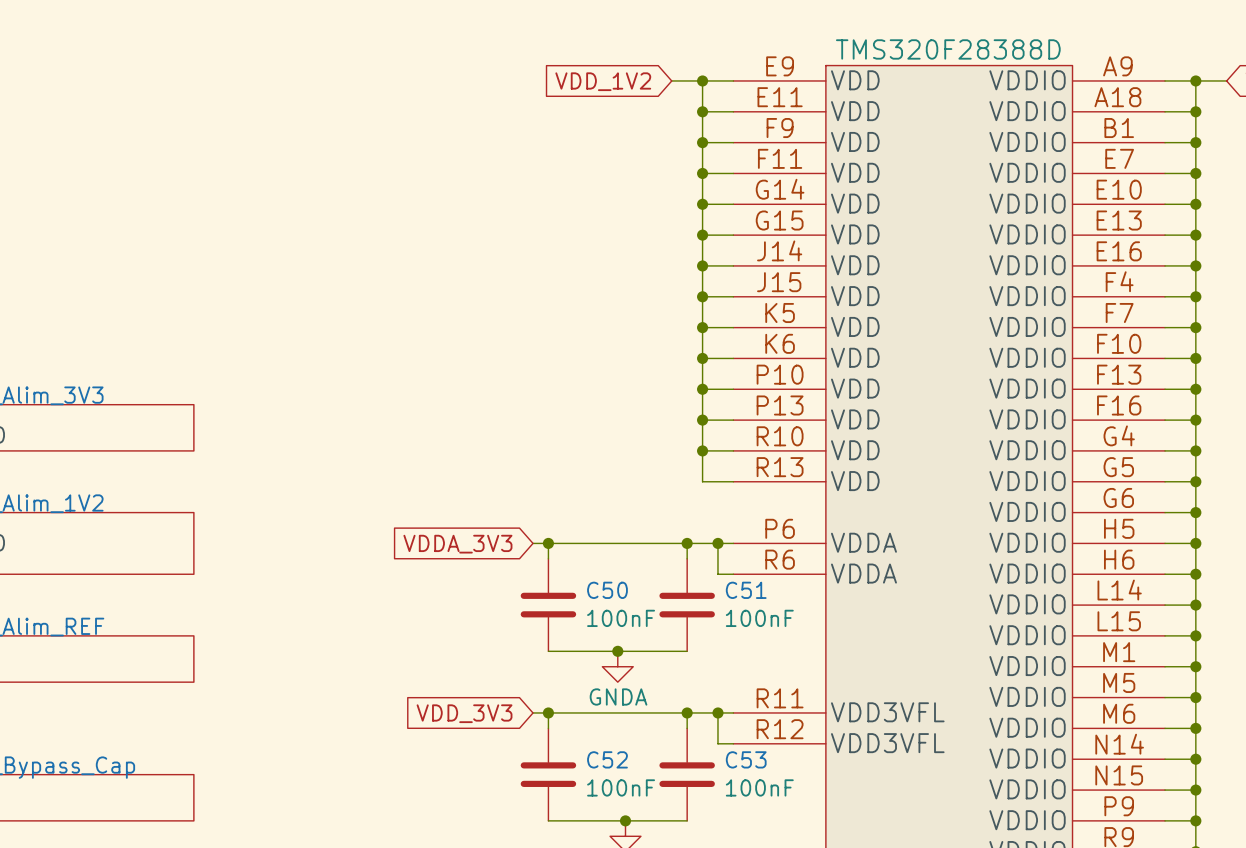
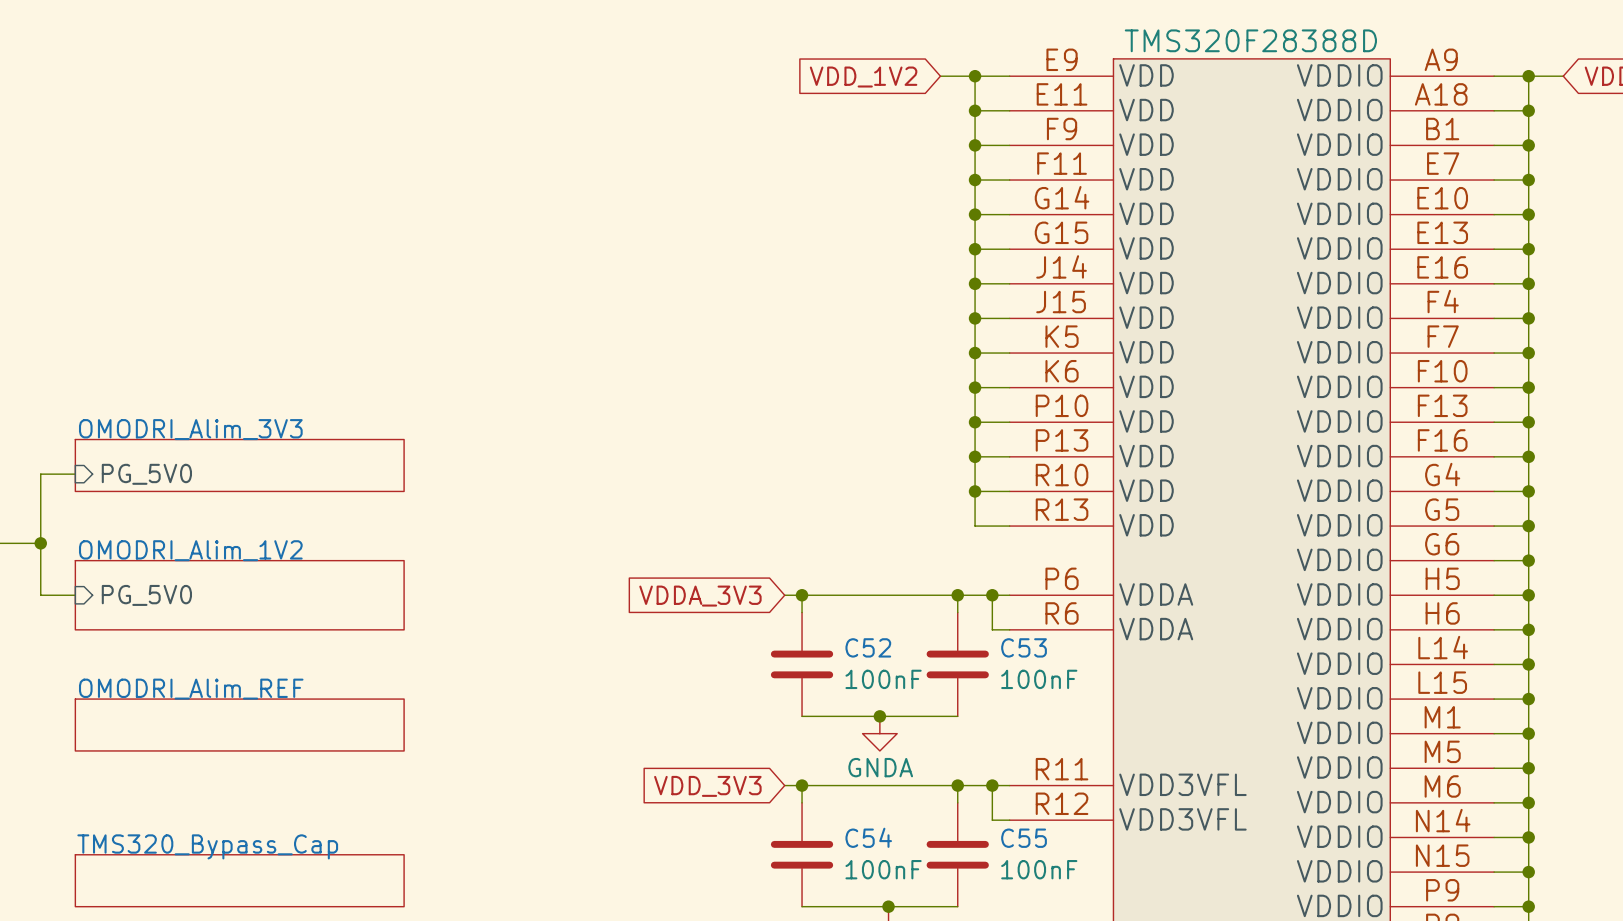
C50 name: C50 (607, 590) -> C52 (868, 647)
C51 name: C51 (746, 590) -> C53 (1024, 647)
C52 name: C52 (607, 759) -> C54 (868, 837)
C53 name: C53 (746, 759) -> C55 (1024, 838)

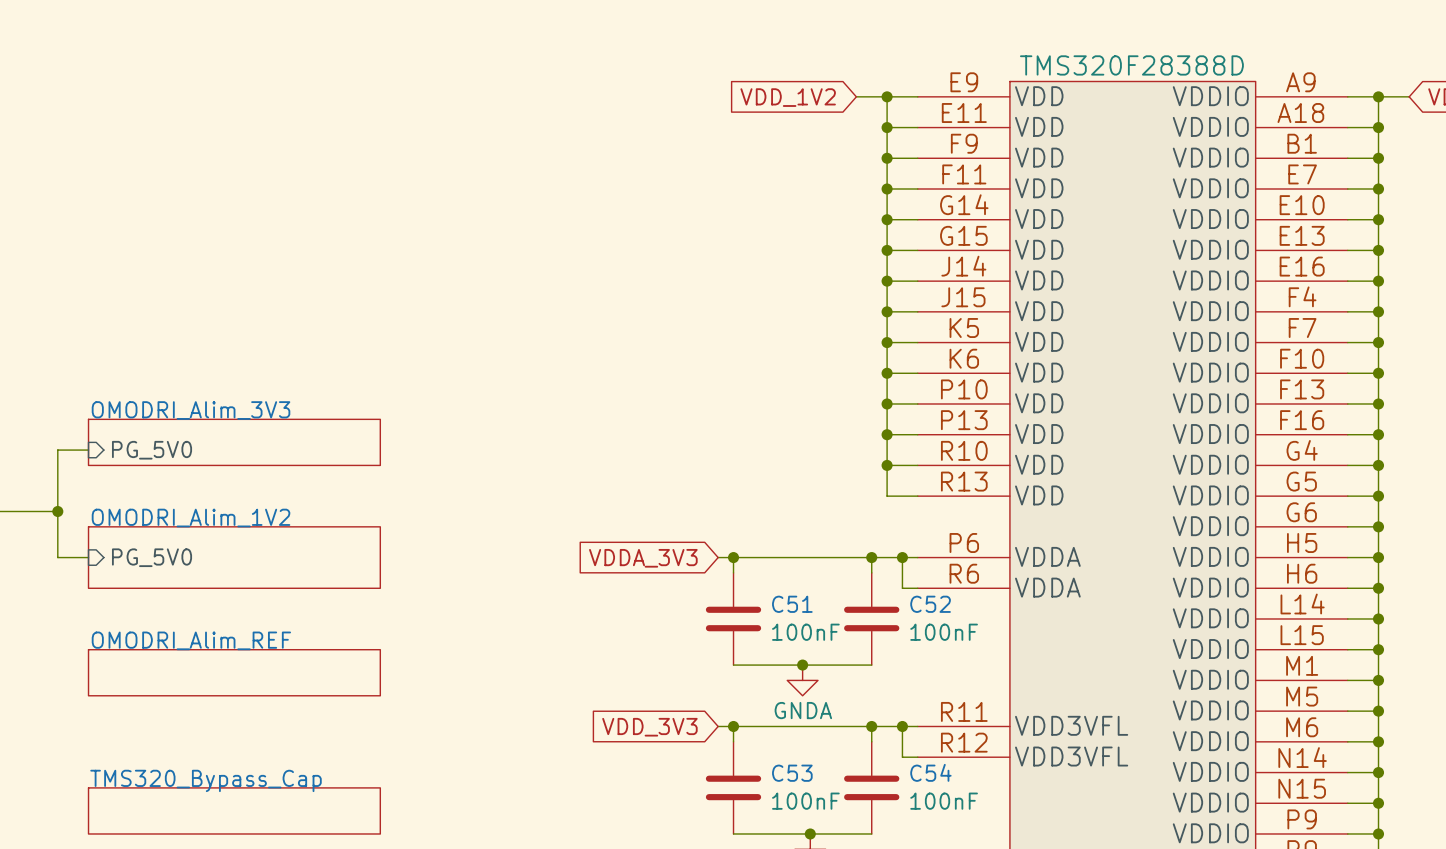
C52 name: C52 (868, 647) -> C51 (792, 604)
C53 name: C53 (1024, 647) -> C52 (930, 604)
C54 name: C54 (868, 837) -> C53 (792, 773)
C55 name: C55 (1024, 838) -> C54 (930, 772)

